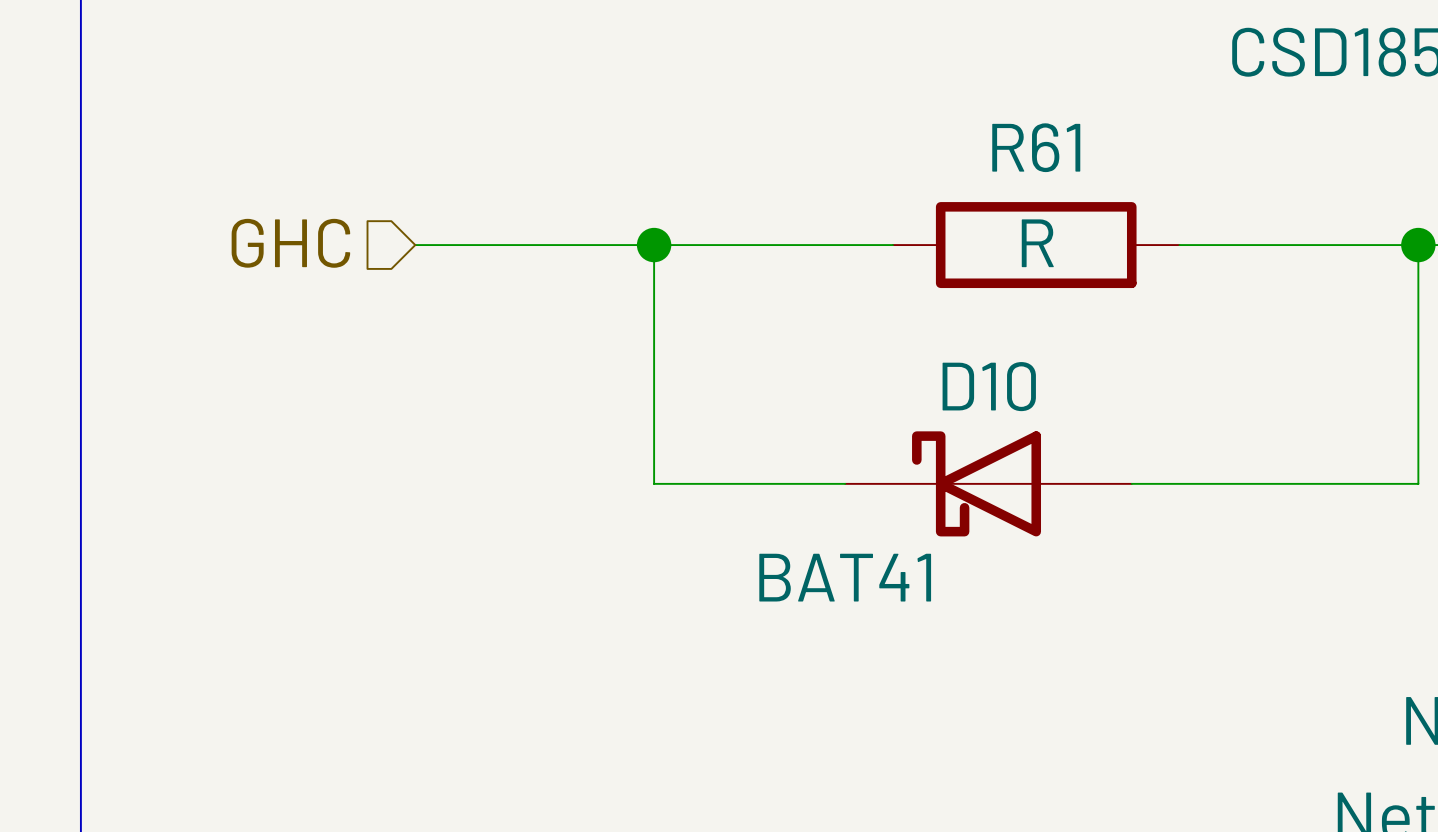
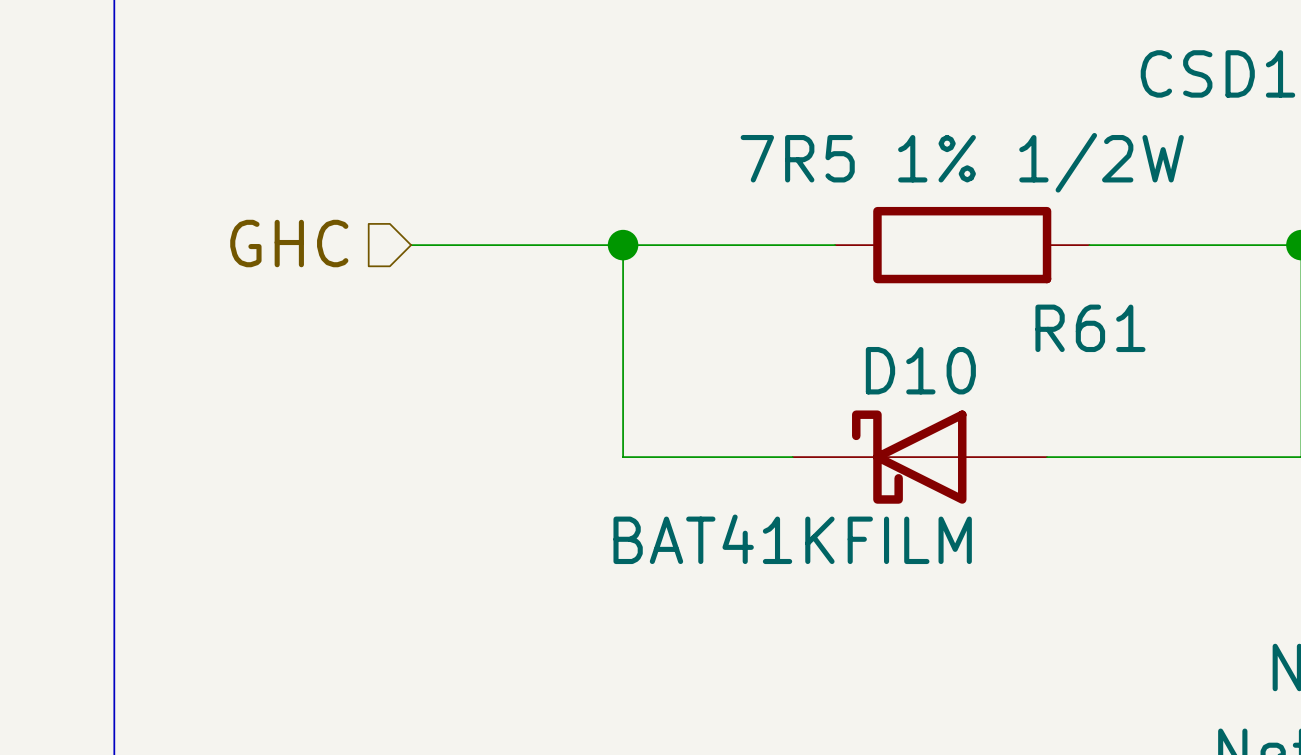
R61 name position: R61 (1036, 147) -> R61 (1090, 328)
R61 value: R (1037, 243) -> 7R5 1% 1/2W (962, 162)
D10 value: BAT41 (845, 577) -> BAT41KFILM (792, 539)

